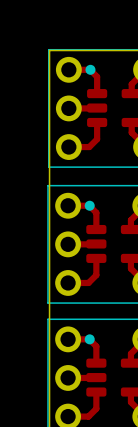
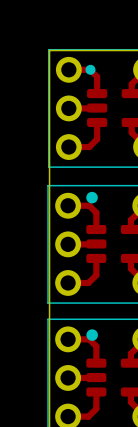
drawing shape: [84, 200, 95, 211] -> [86, 191, 98, 204]
drawing shape: [84, 334, 95, 345] -> [86, 329, 98, 341]

